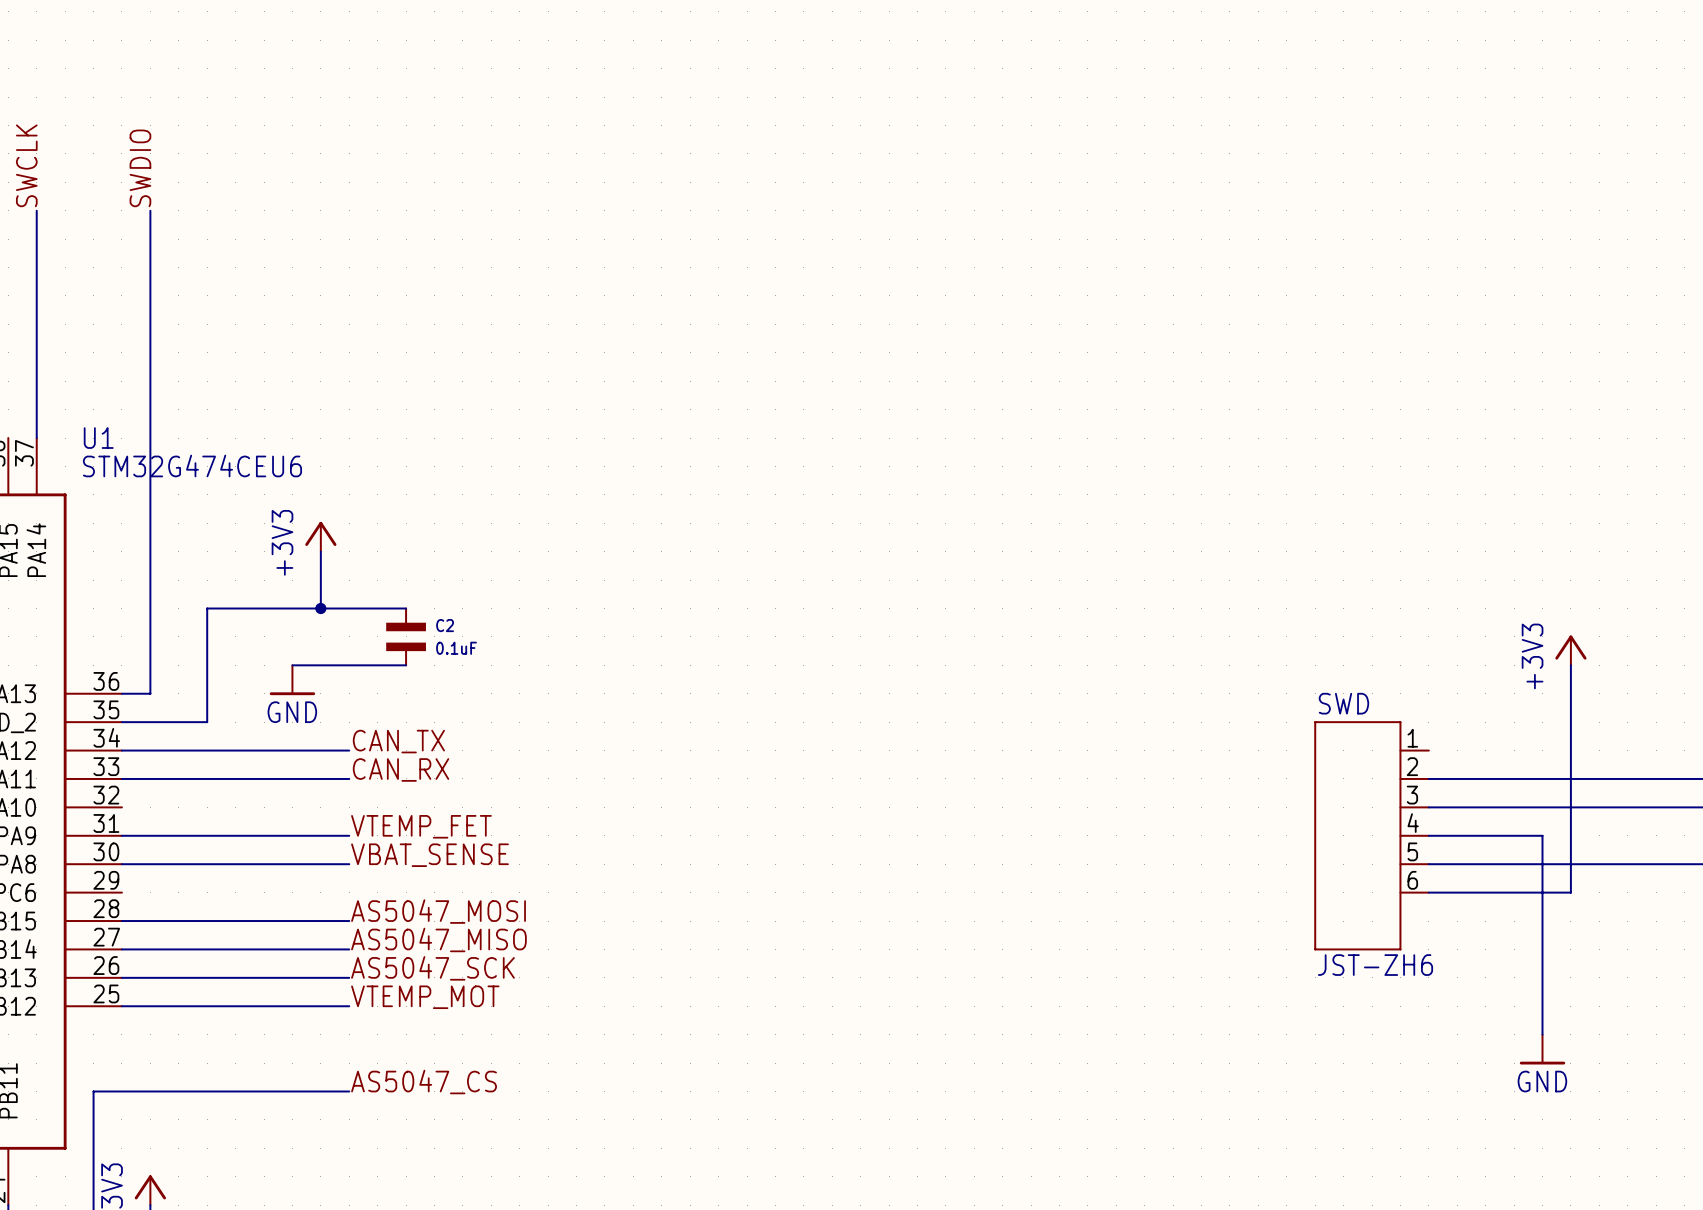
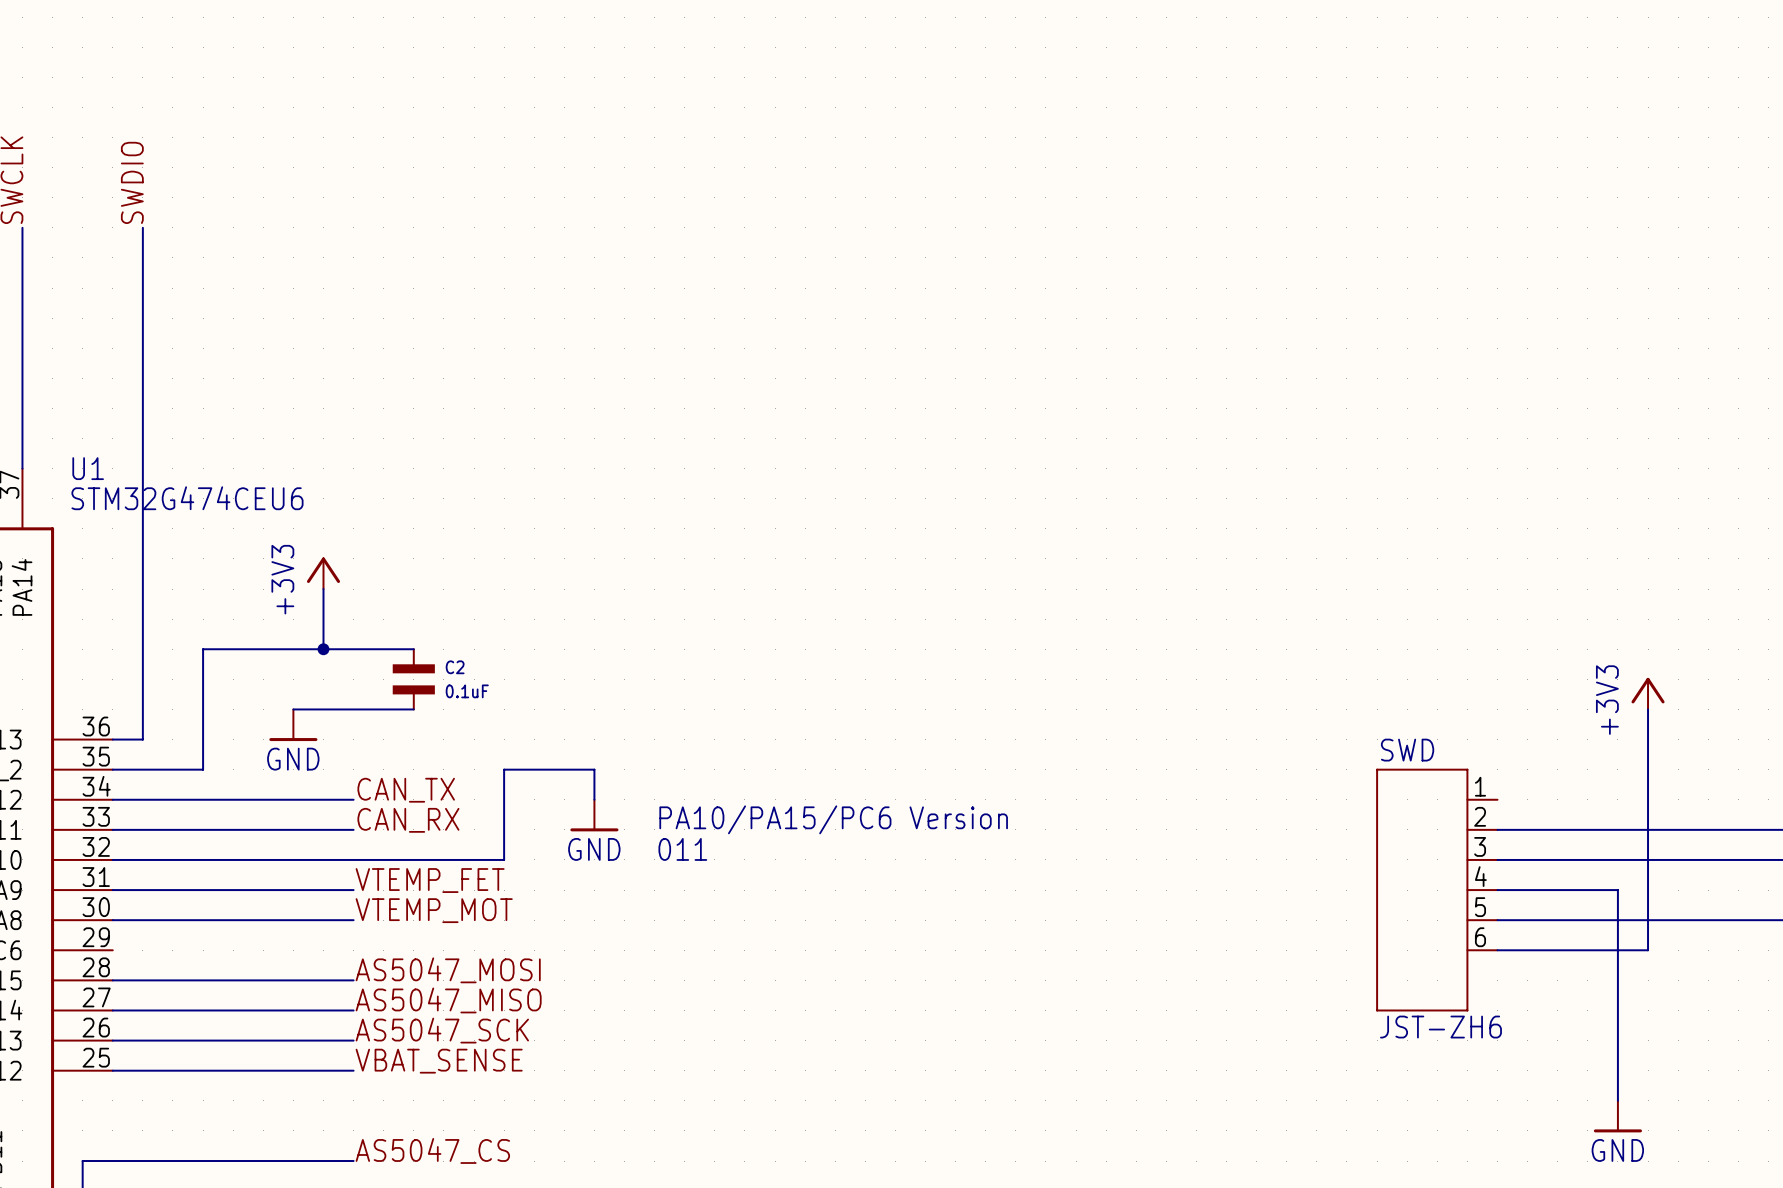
wire: none -> (594, 799) (594, 769) (504, 769) (504, 859) (112, 859)
power symbol: none -> GND (594, 815)
text: none -> PA10/PA15/PC6 Version (833, 819)
text: none -> 011 (682, 849)
label: VBAT_SENSE (429, 855) -> VTEMP_MOT (434, 910)
label: VTEMP_MOT (425, 997) -> VBAT_SENSE (439, 1061)

